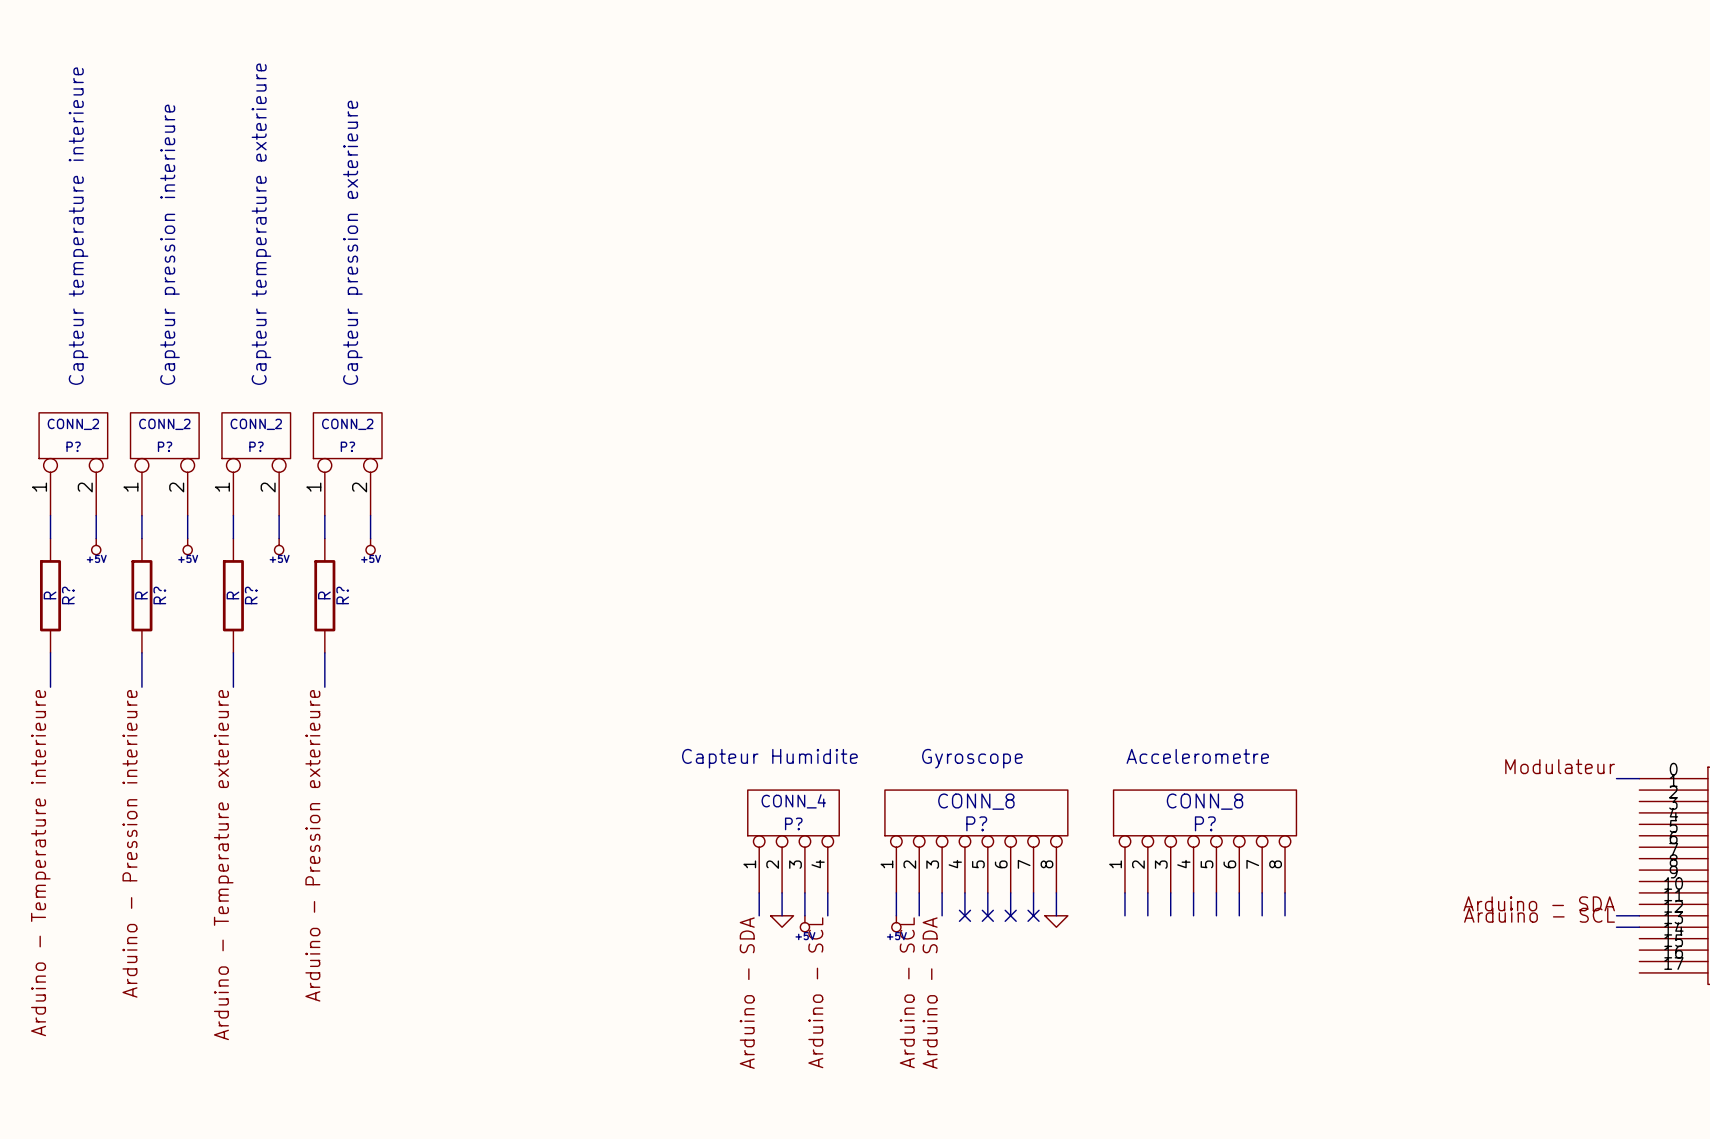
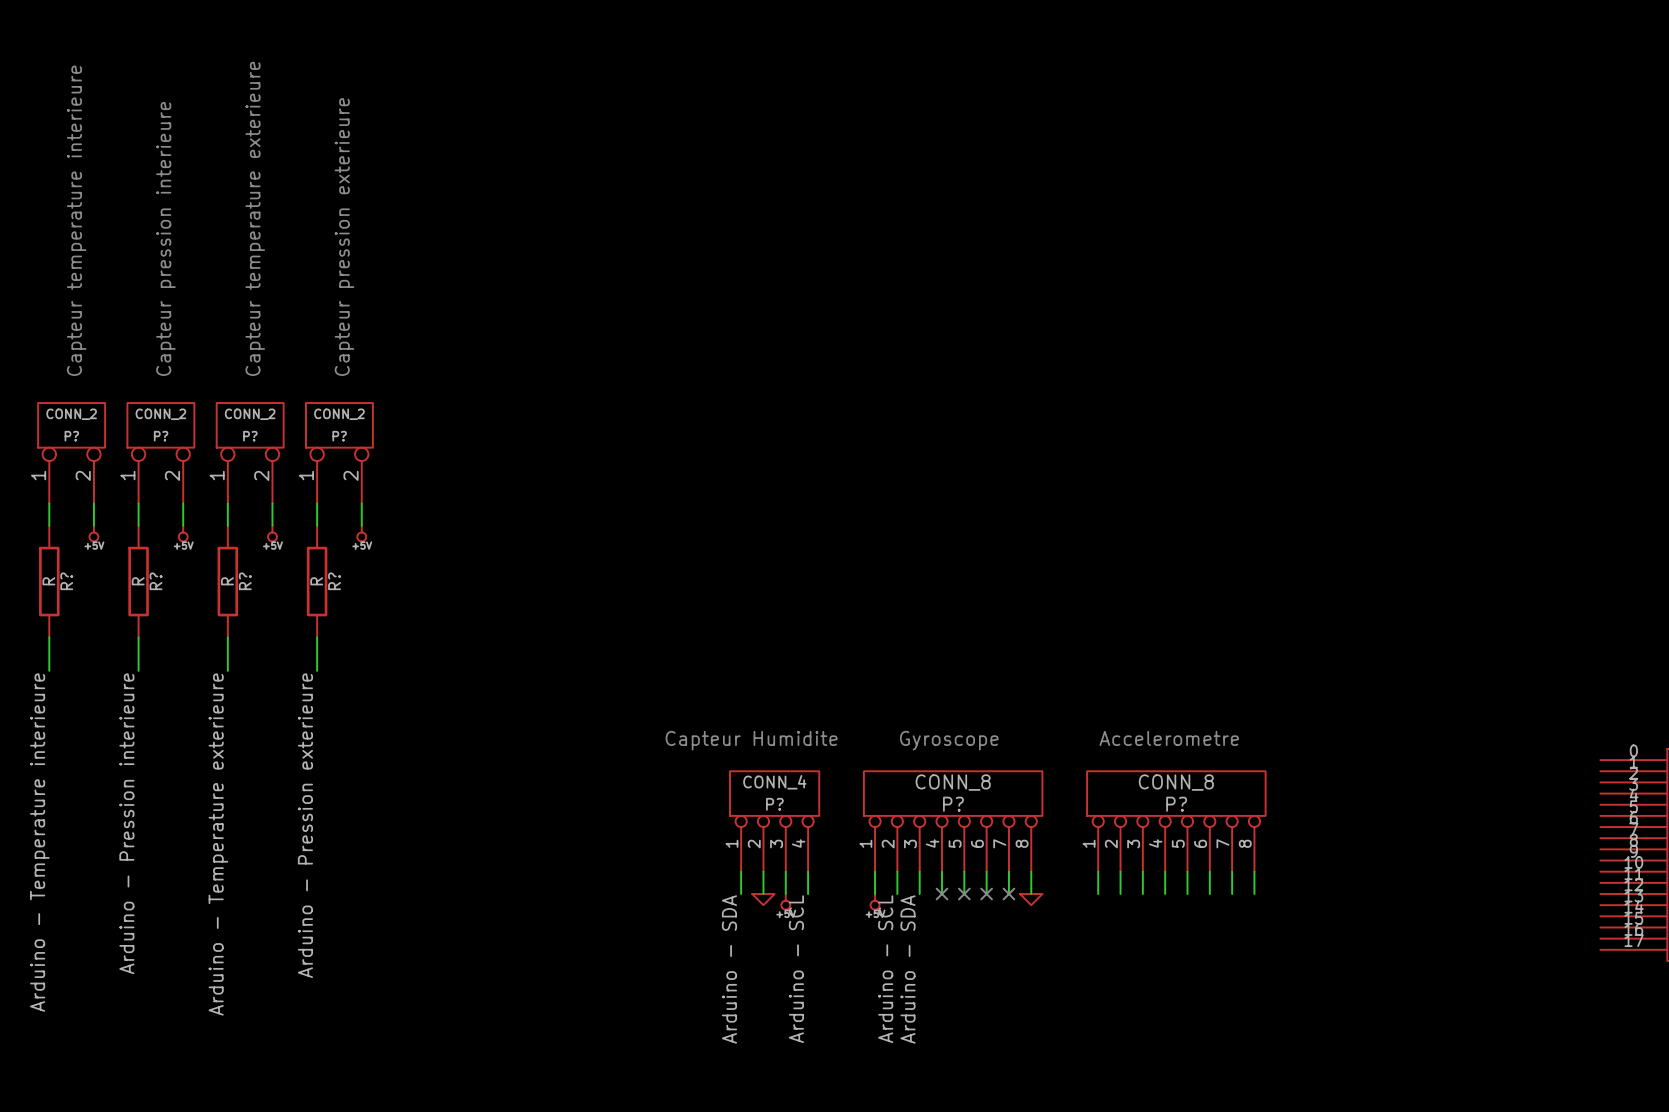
label: Modulateur (1560, 766) -> none
wire: (1616, 778) (1639, 778) -> none
label: Arduino - SDA (1539, 903) -> none
label: Arduino - SCL (1539, 915) -> none
wire: (1616, 915) (1639, 915) -> none
wire: (1616, 927) (1639, 927) -> none

